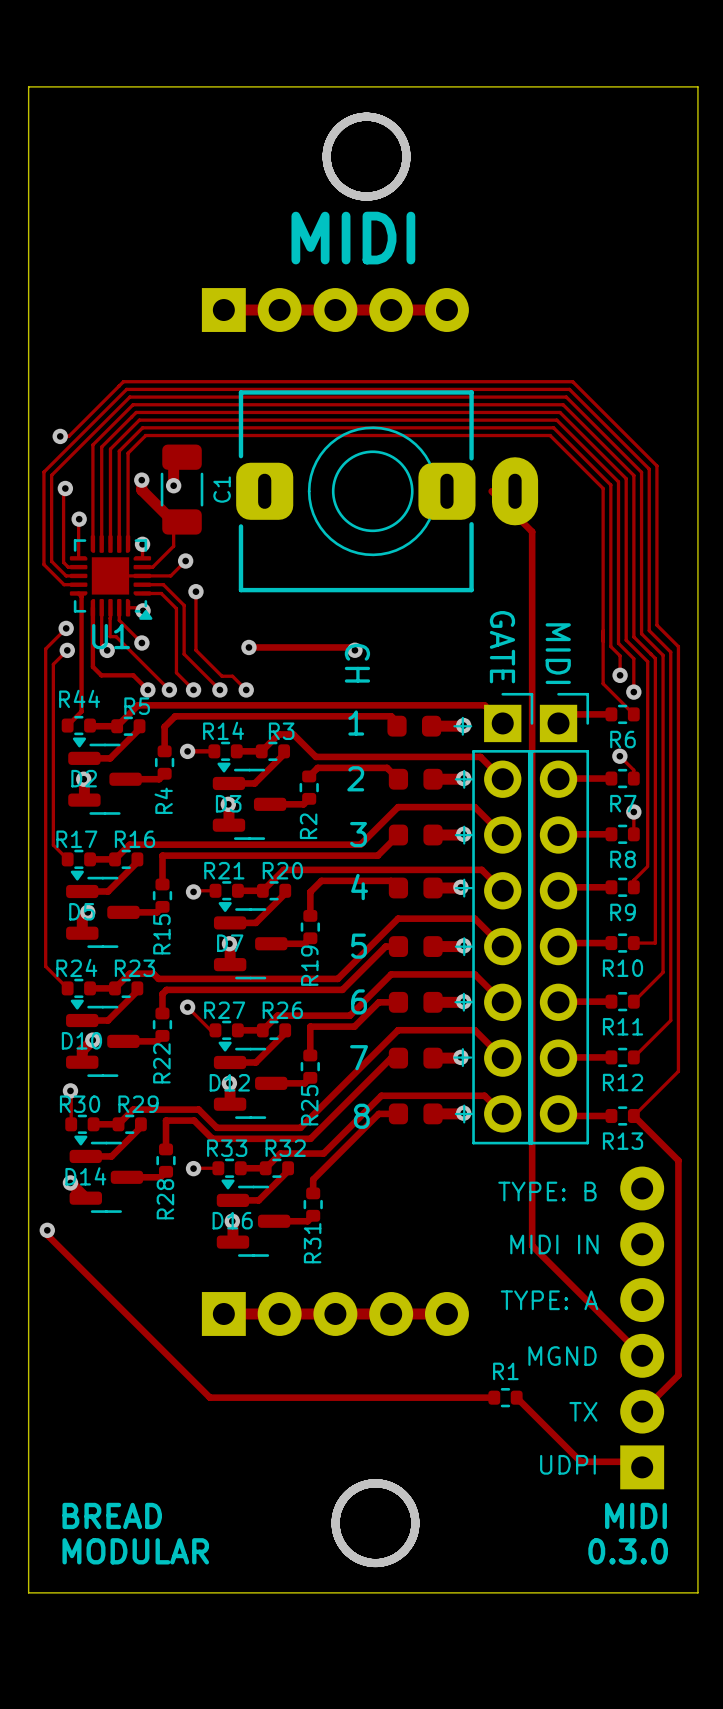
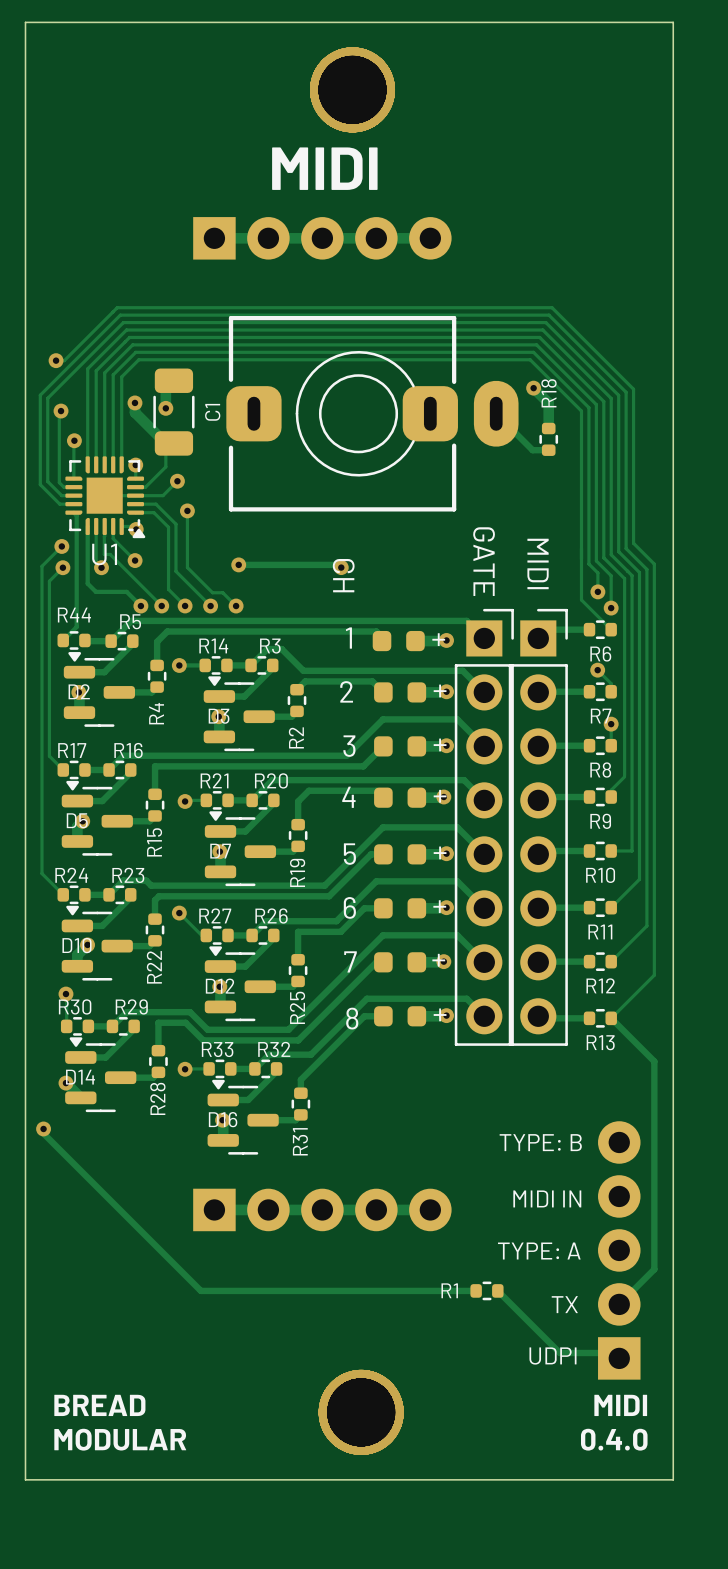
track: none -> (533, 388) (548, 403) (548, 423)
via: none -> (533, 388)
track: (491, 491) (532, 531) (532, 1245) (628, 1341) (650, 1341) -> none
track: none -> (496, 413) (532, 450) (548, 450)
R18: none -> (548, 439)
text: TYPE: B (547, 1191) -> none
text: MIDI IN (554, 1244) -> TYPE: B (540, 1142)
text position: TYPE: A (549, 1300) -> TYPE: A (539, 1251)
text: none -> MIDI IN (547, 1198)
part: (642, 1327) -> none
part: none -> (619, 1250)
text: MGND (562, 1356) -> none
R1 name position: R1 (505, 1371) -> R1 (449, 1290)
text: 0.3.0 (628, 1551) -> 0.4.0 (614, 1439)

